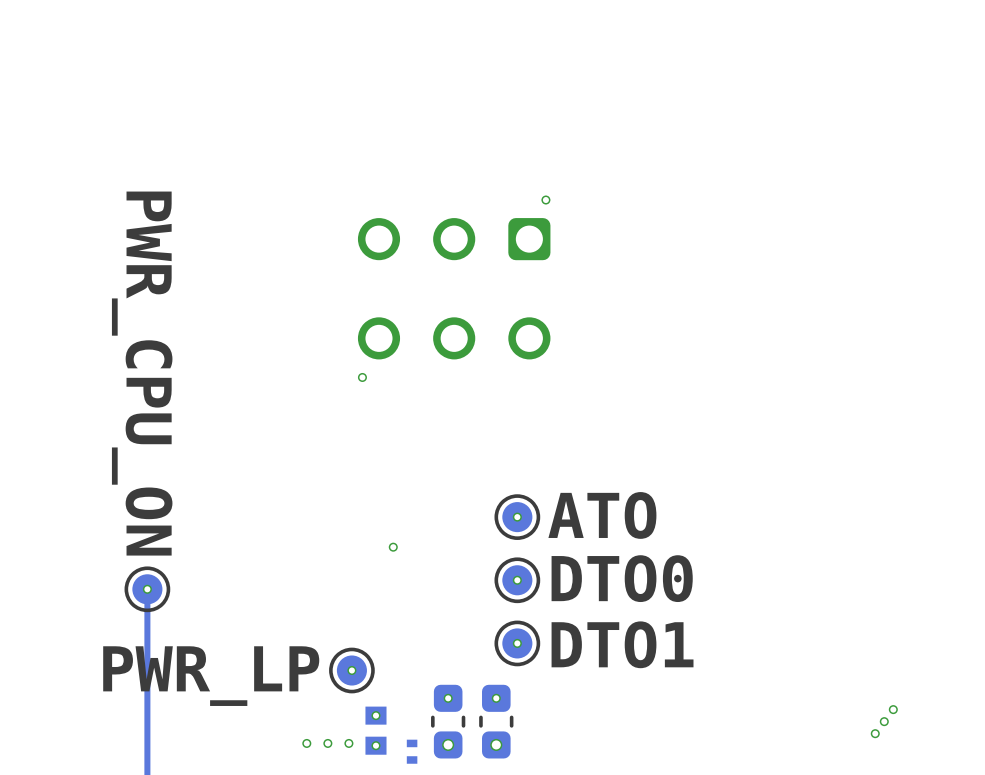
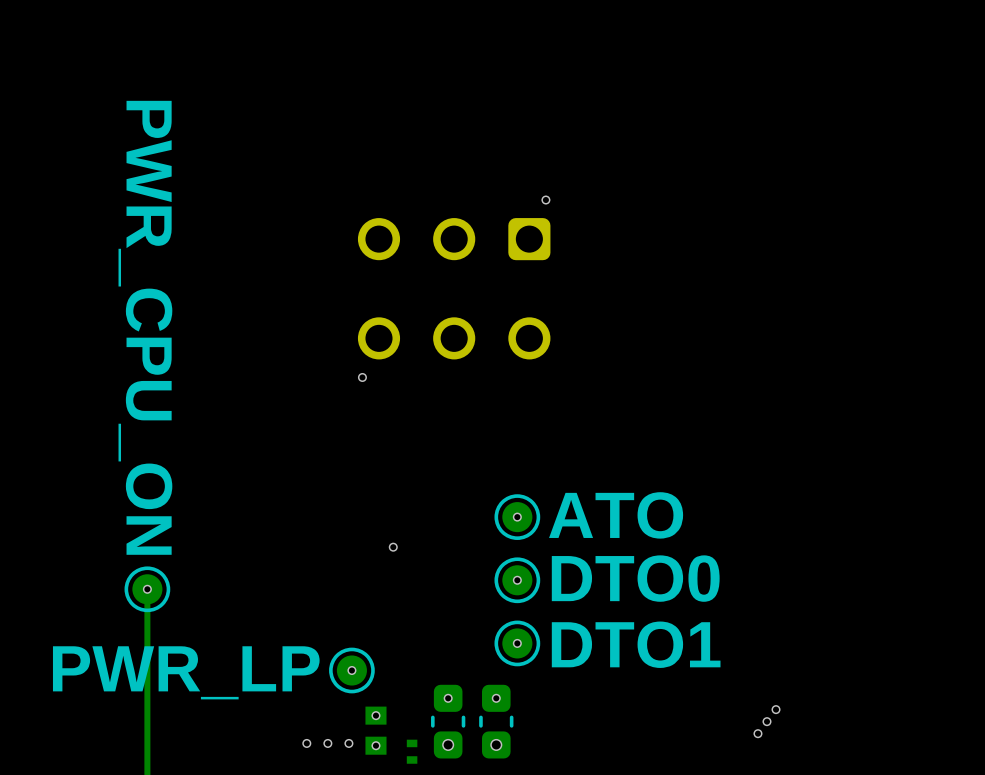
via: none -> (776, 709)
via: (893, 709) -> none
via: none -> (766, 721)
via: (884, 721) -> none
via: none -> (757, 733)
via: (875, 733) -> none

